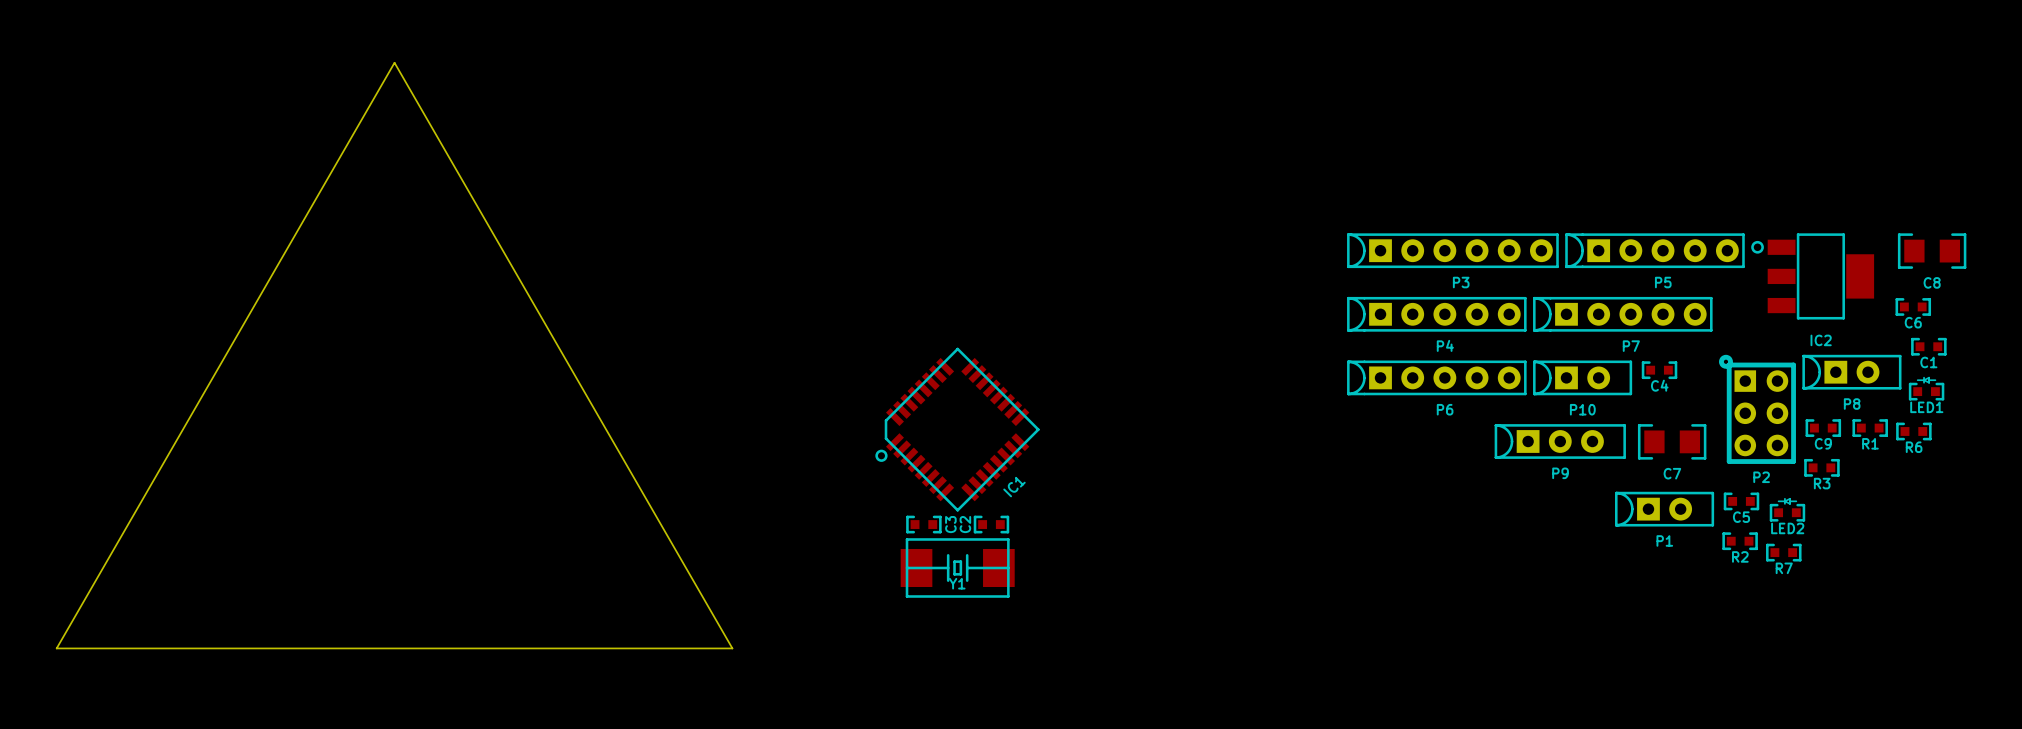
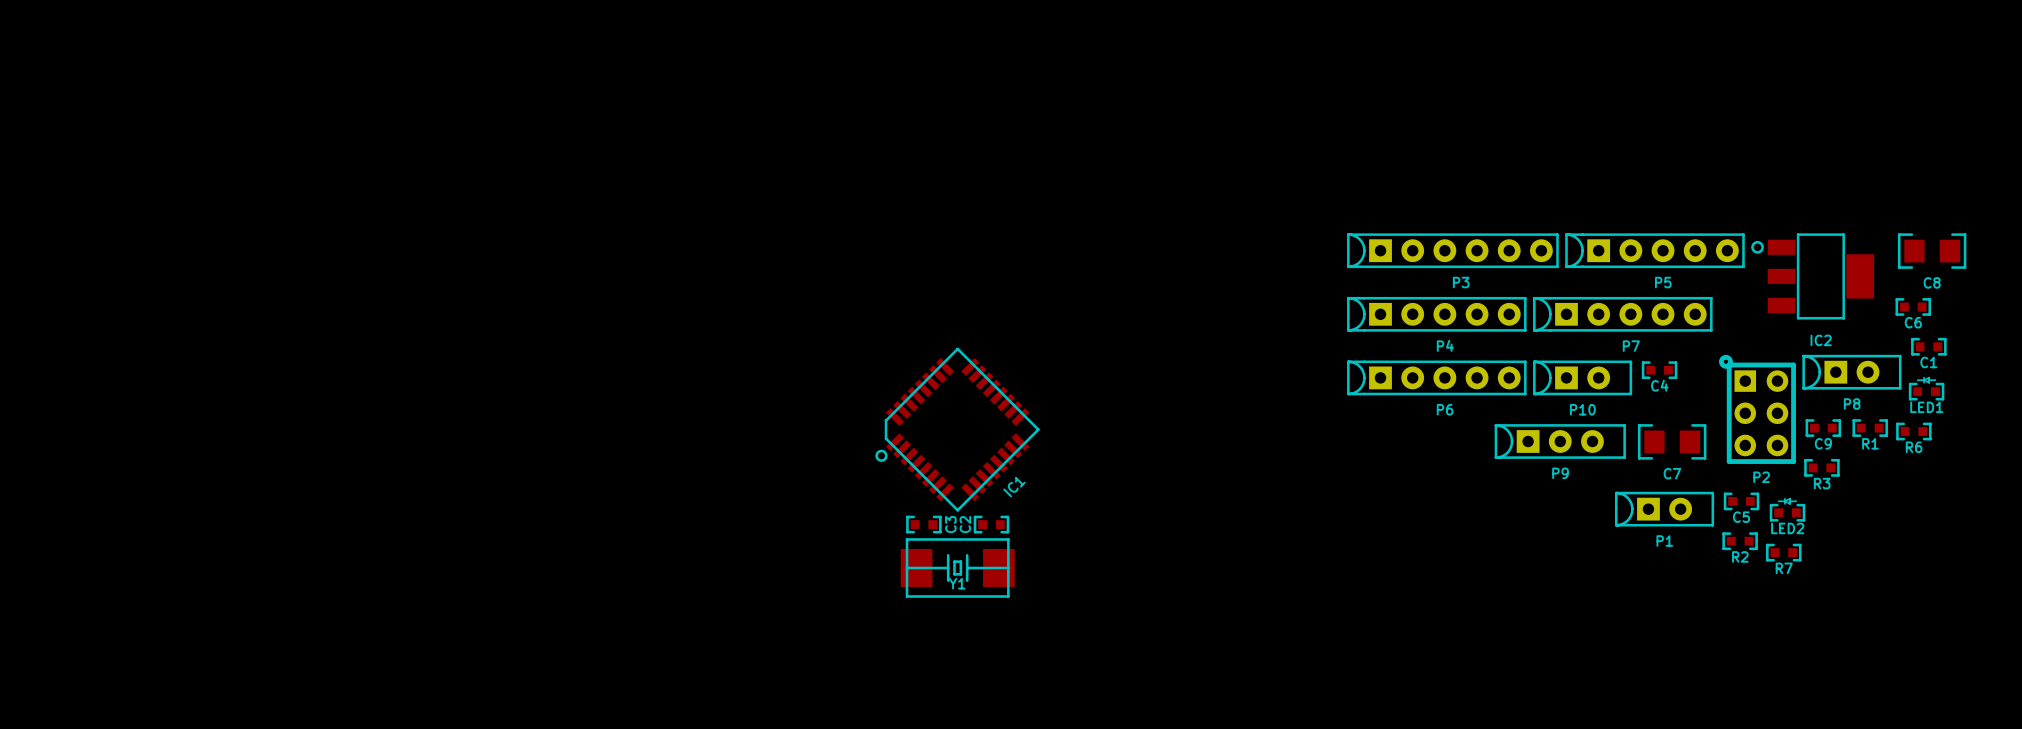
board edge: (394, 62) (732, 648) (56, 648) (394, 62) -> none

